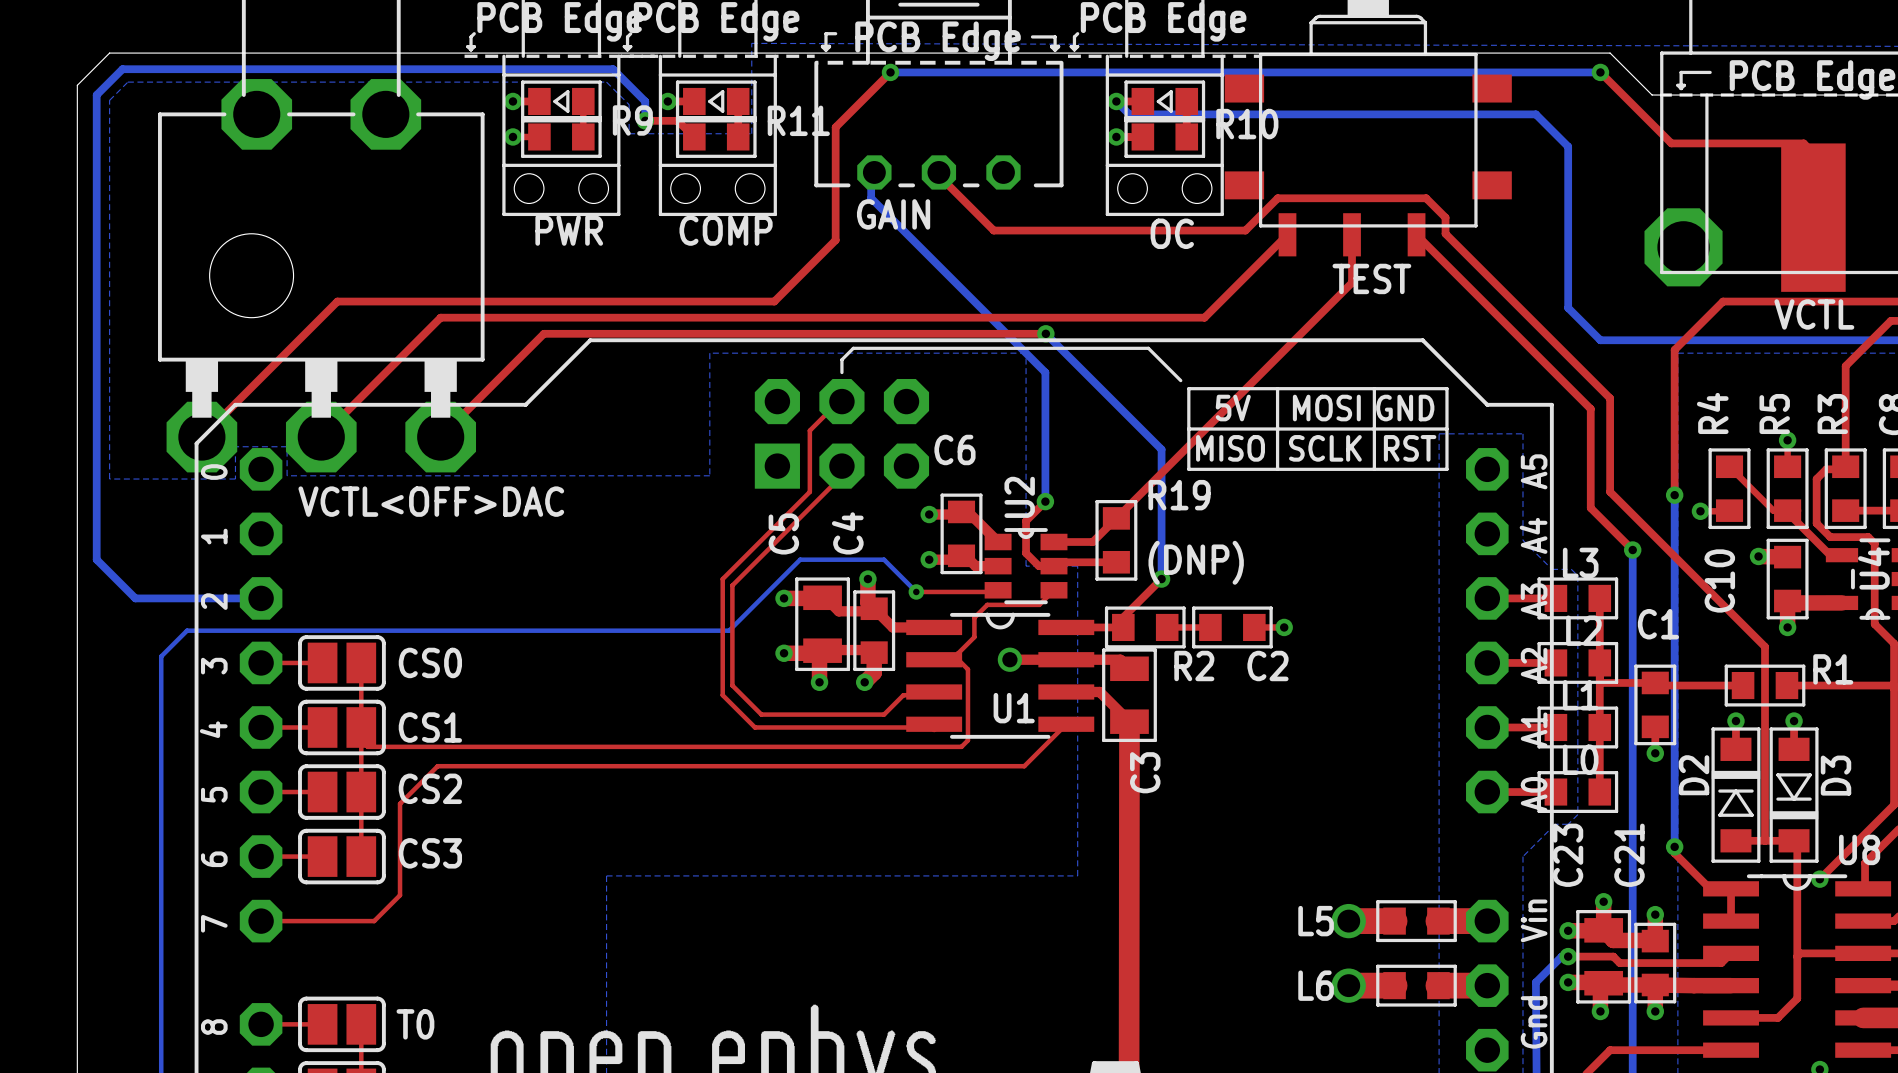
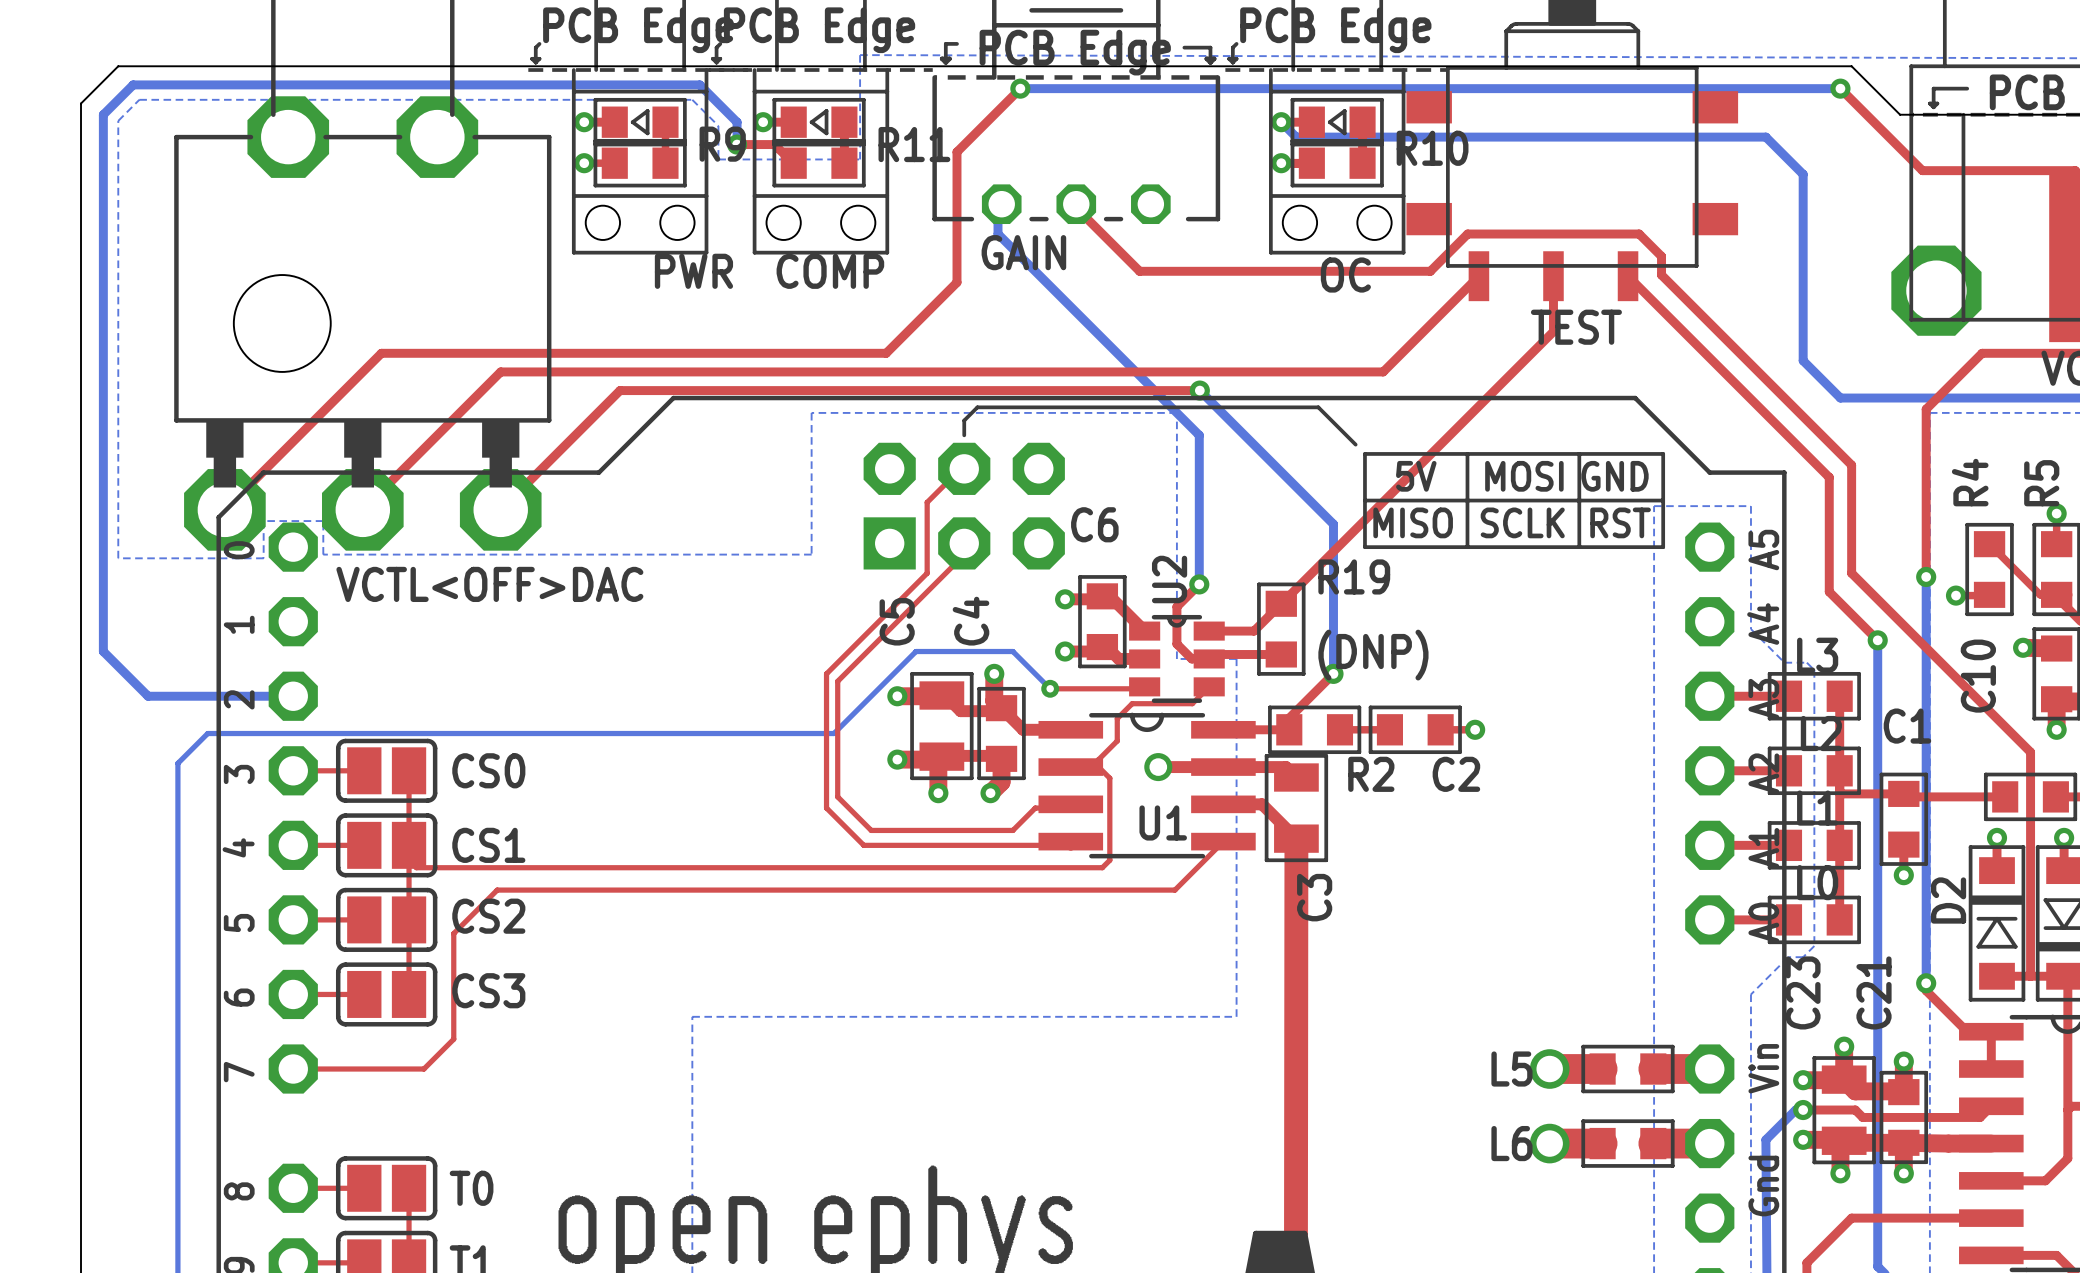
PWR name position: PWR (569, 230) -> PWR (693, 271)

